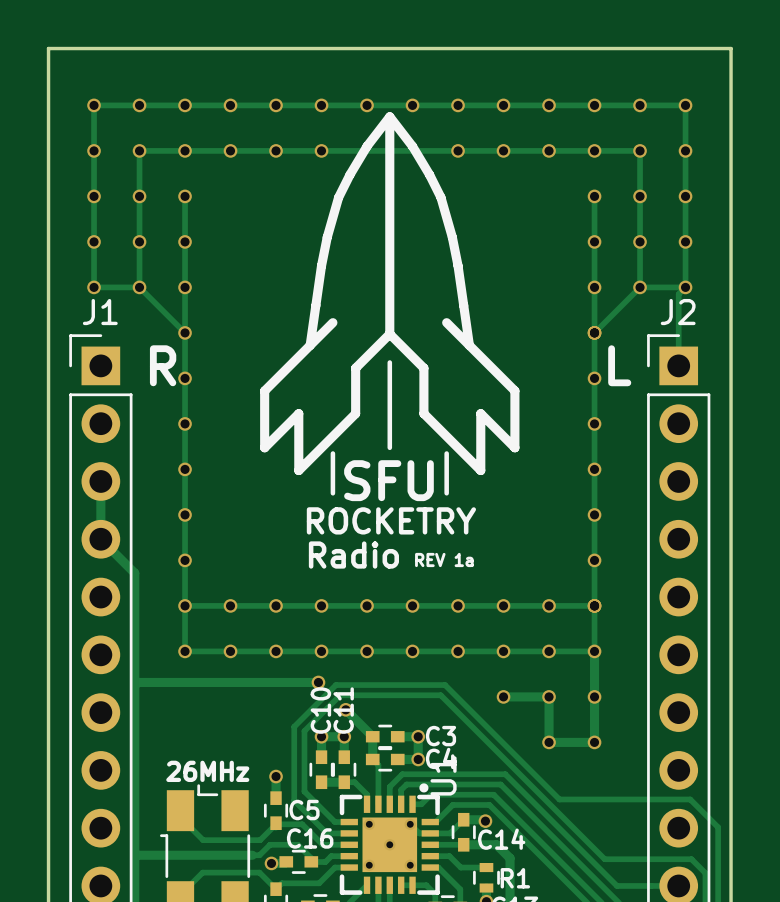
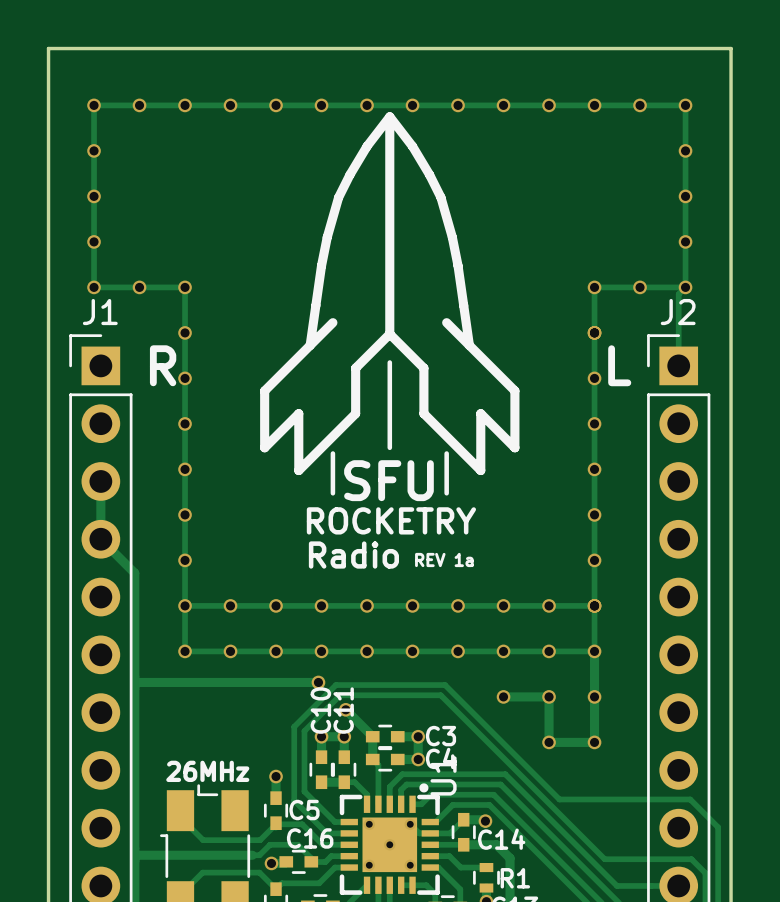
via: (139, 150) -> none
via: (185, 150) -> none
via: (230, 150) -> none
via: (276, 150) -> none
via: (321, 150) -> none
via: (458, 150) -> none
via: (503, 150) -> none
via: (549, 150) -> none
via: (594, 150) -> none
via: (640, 150) -> none
via: (139, 196) -> none
track: (185, 196) (185, 287) -> (139, 287) (185, 287)
via: (185, 196) -> none
track: (594, 196) (594, 287) -> (640, 287) (594, 287)
via: (594, 196) -> none
via: (640, 196) -> none
via: (139, 241) -> none
via: (185, 241) -> none
via: (594, 241) -> none
via: (640, 241) -> none
track: (185, 332) (139, 287) (139, 150) (640, 150) (640, 287) (594, 332) -> none

